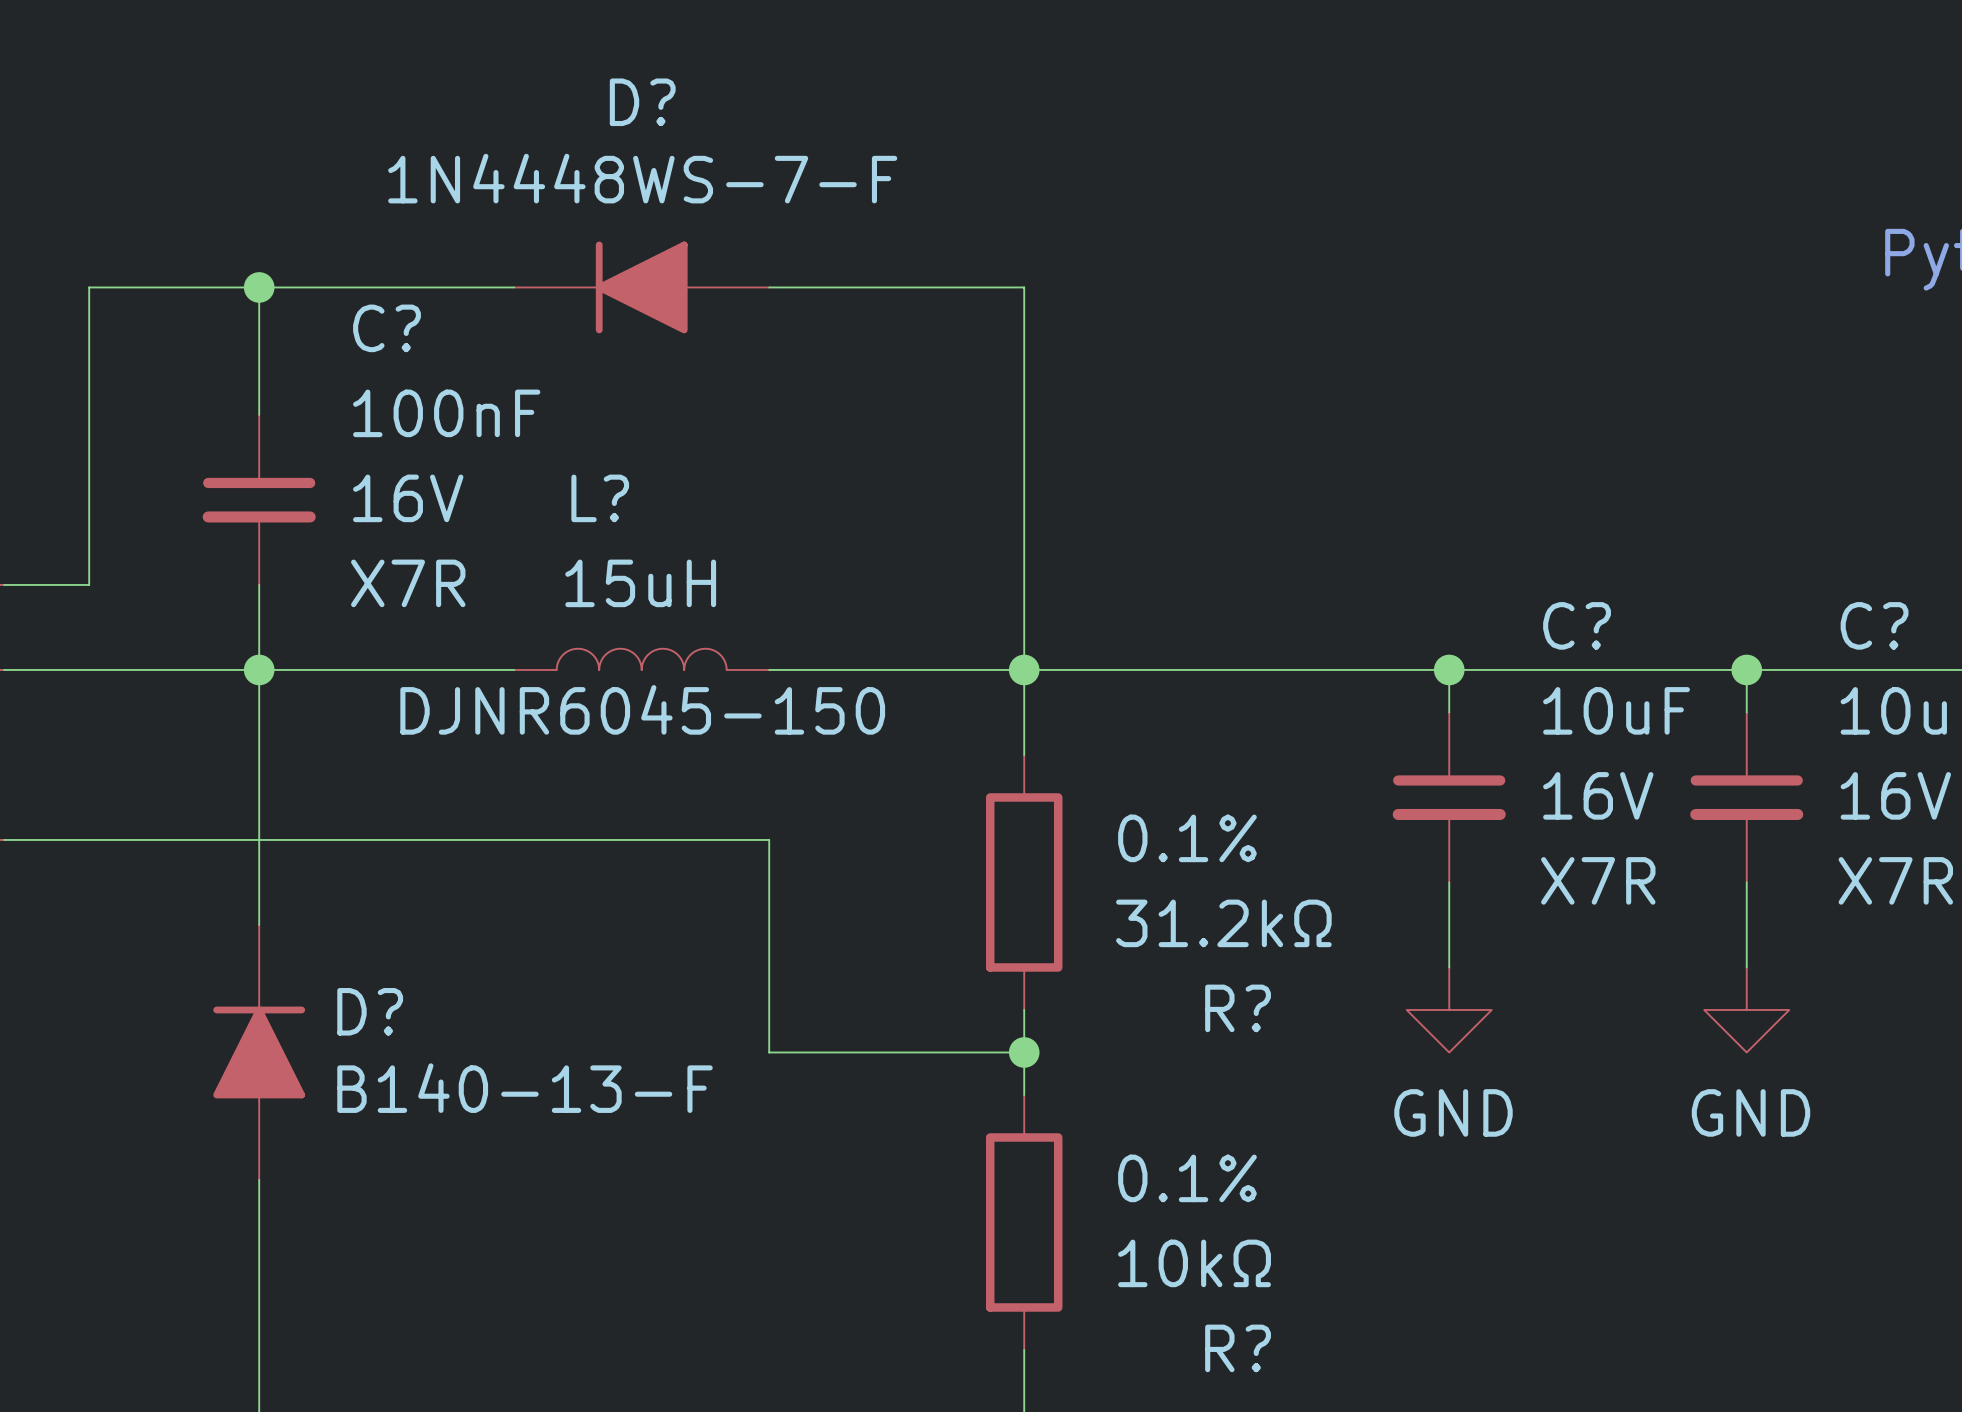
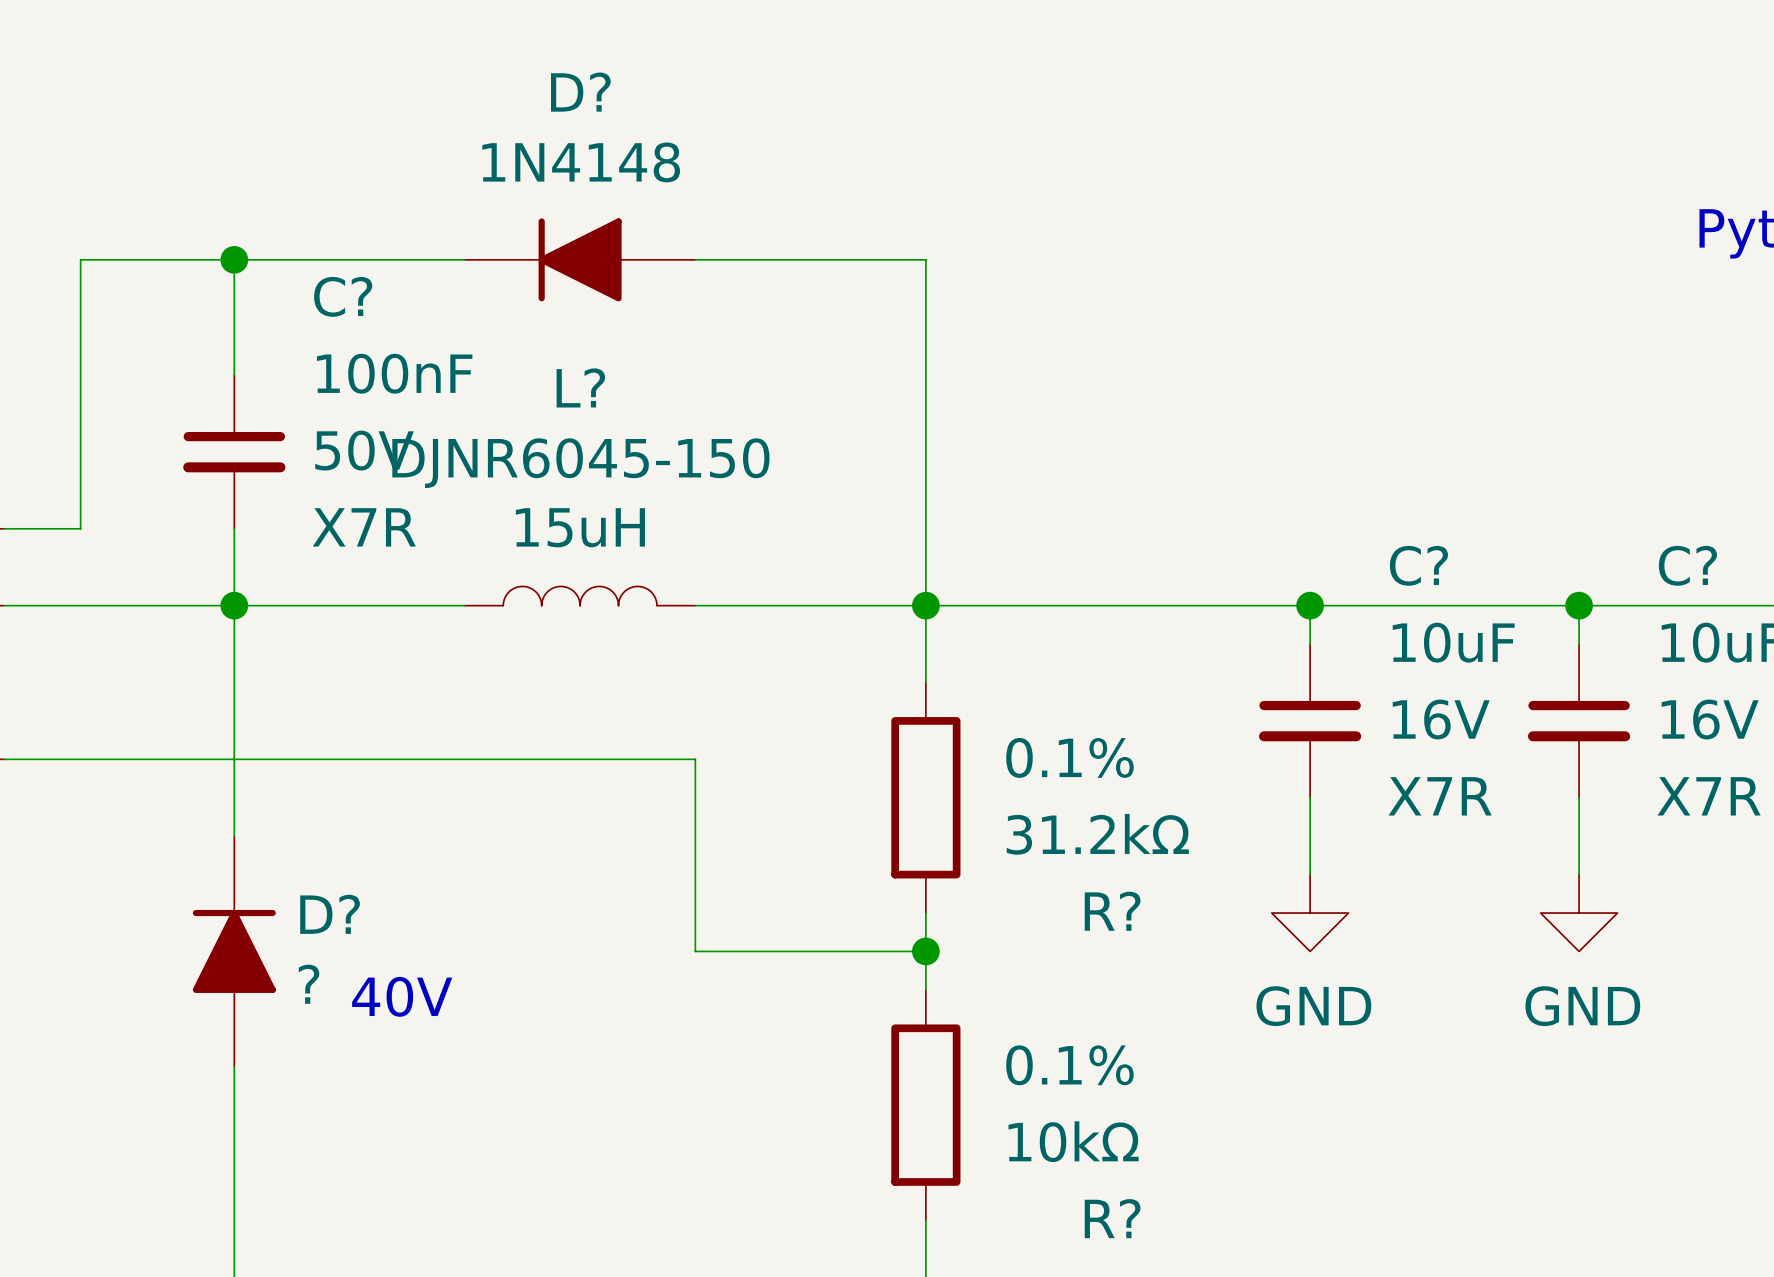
D? value: 1N4448WS-7-F (642, 178) -> 1N4148 (581, 162)
C? text: 16V (408, 498) -> 50V (364, 450)
L? name position: L? (600, 498) -> L? (580, 387)
L? value position: DJNR6045-150 (642, 709) -> DJNR6045-150 (580, 463)
D? value: B140-13-F (525, 1088) -> ? (309, 984)
text: none -> 40V (402, 996)

